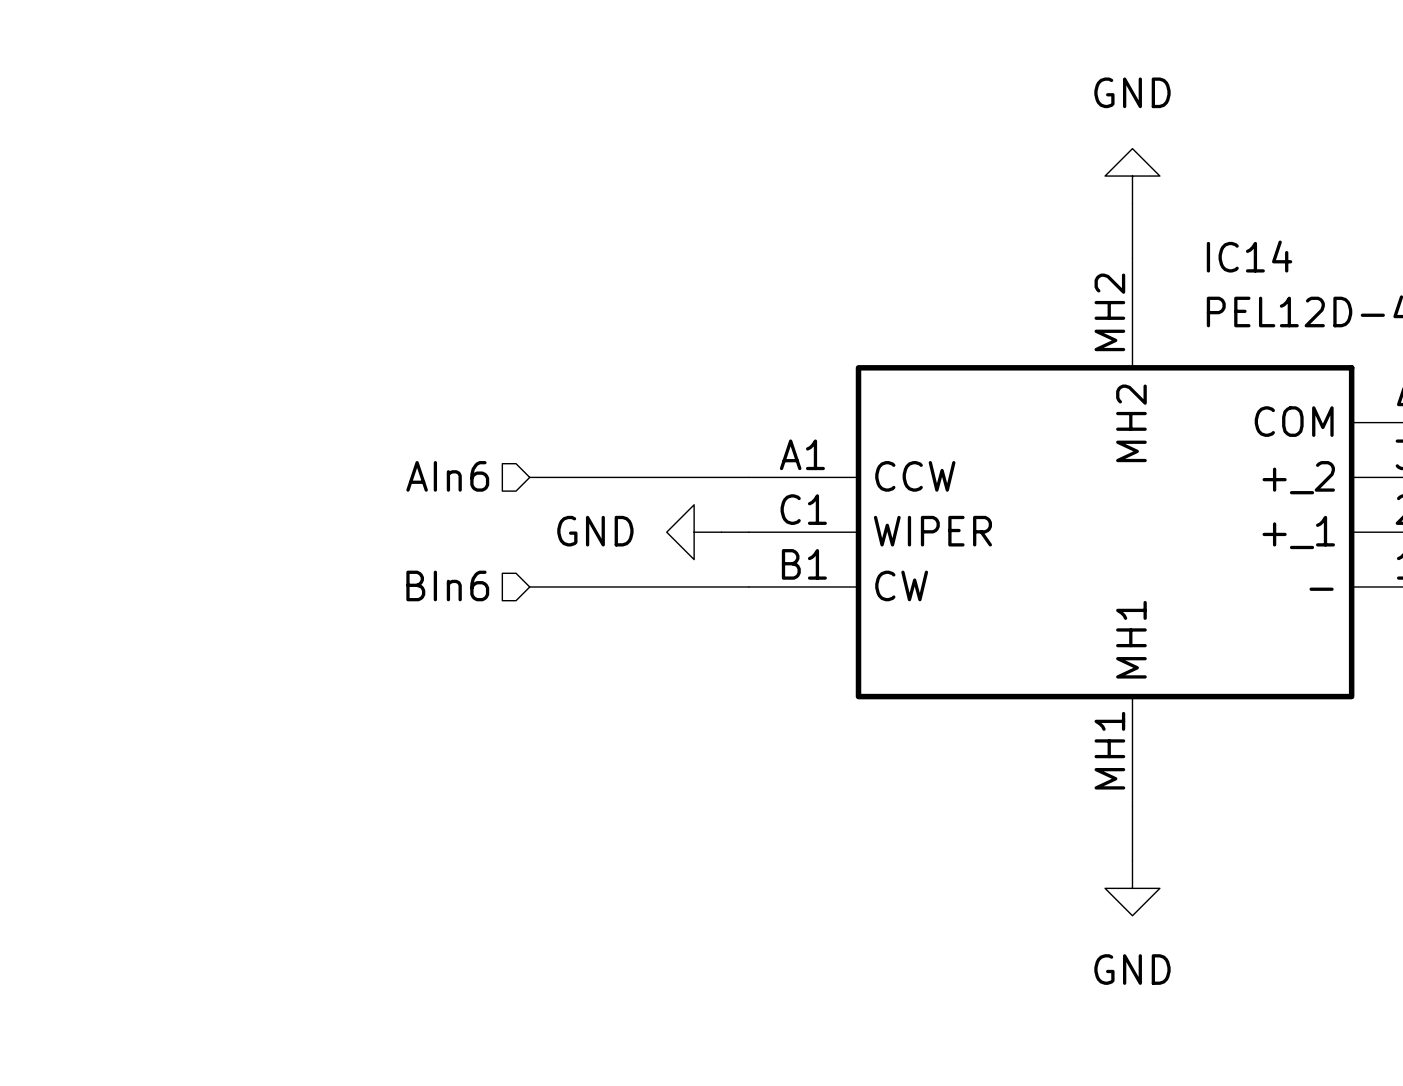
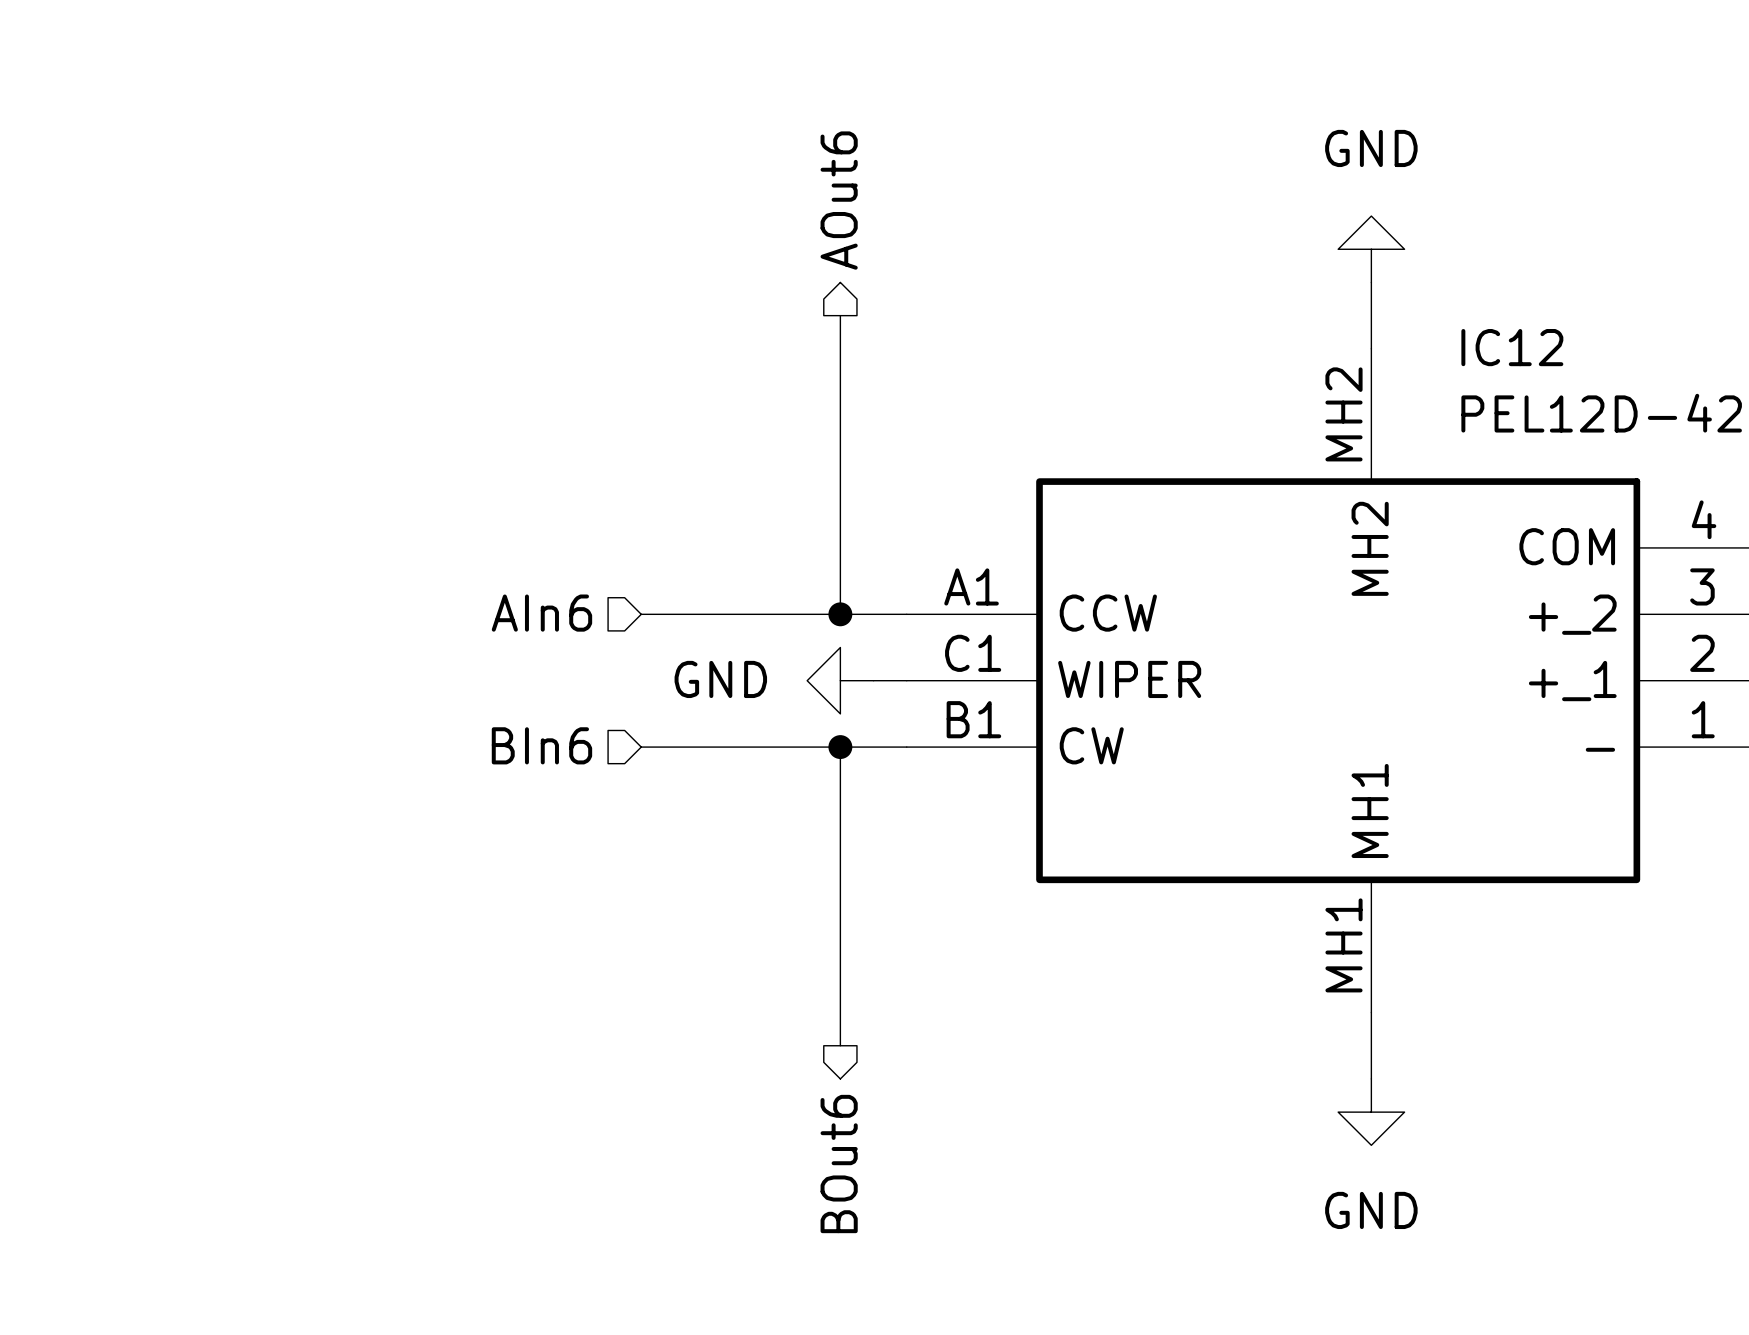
hierarchical label: none -> AOut6 (839, 200)
wire: none -> (840, 315) (840, 614)
IC14 name: IC14 (1249, 256) -> IC12 (1512, 347)
junction: none -> (840, 614)
wire: none -> (840, 747) (840, 1045)
junction: none -> (840, 747)
hierarchical label: none -> BOut6 (839, 1164)

